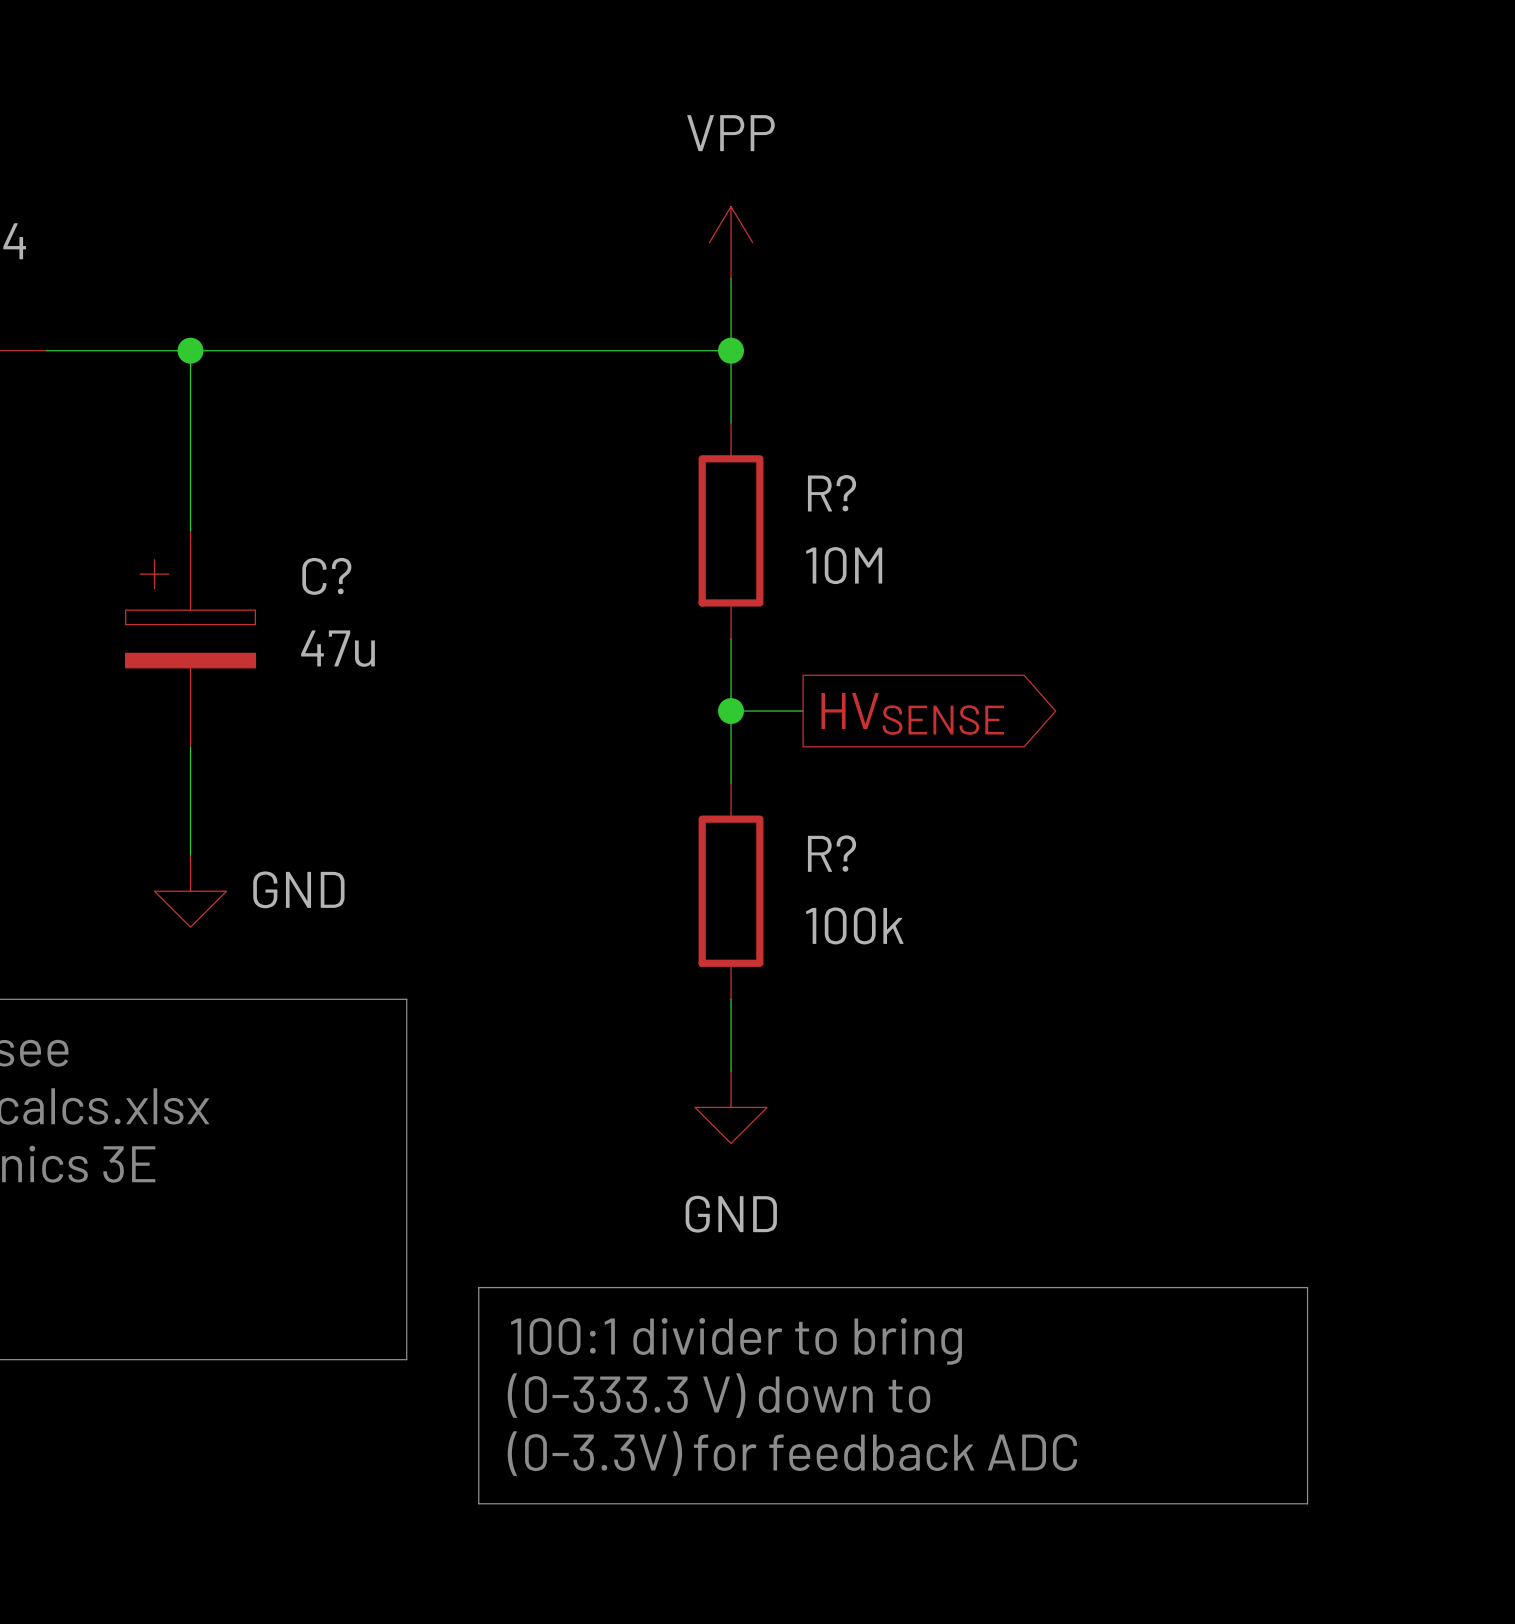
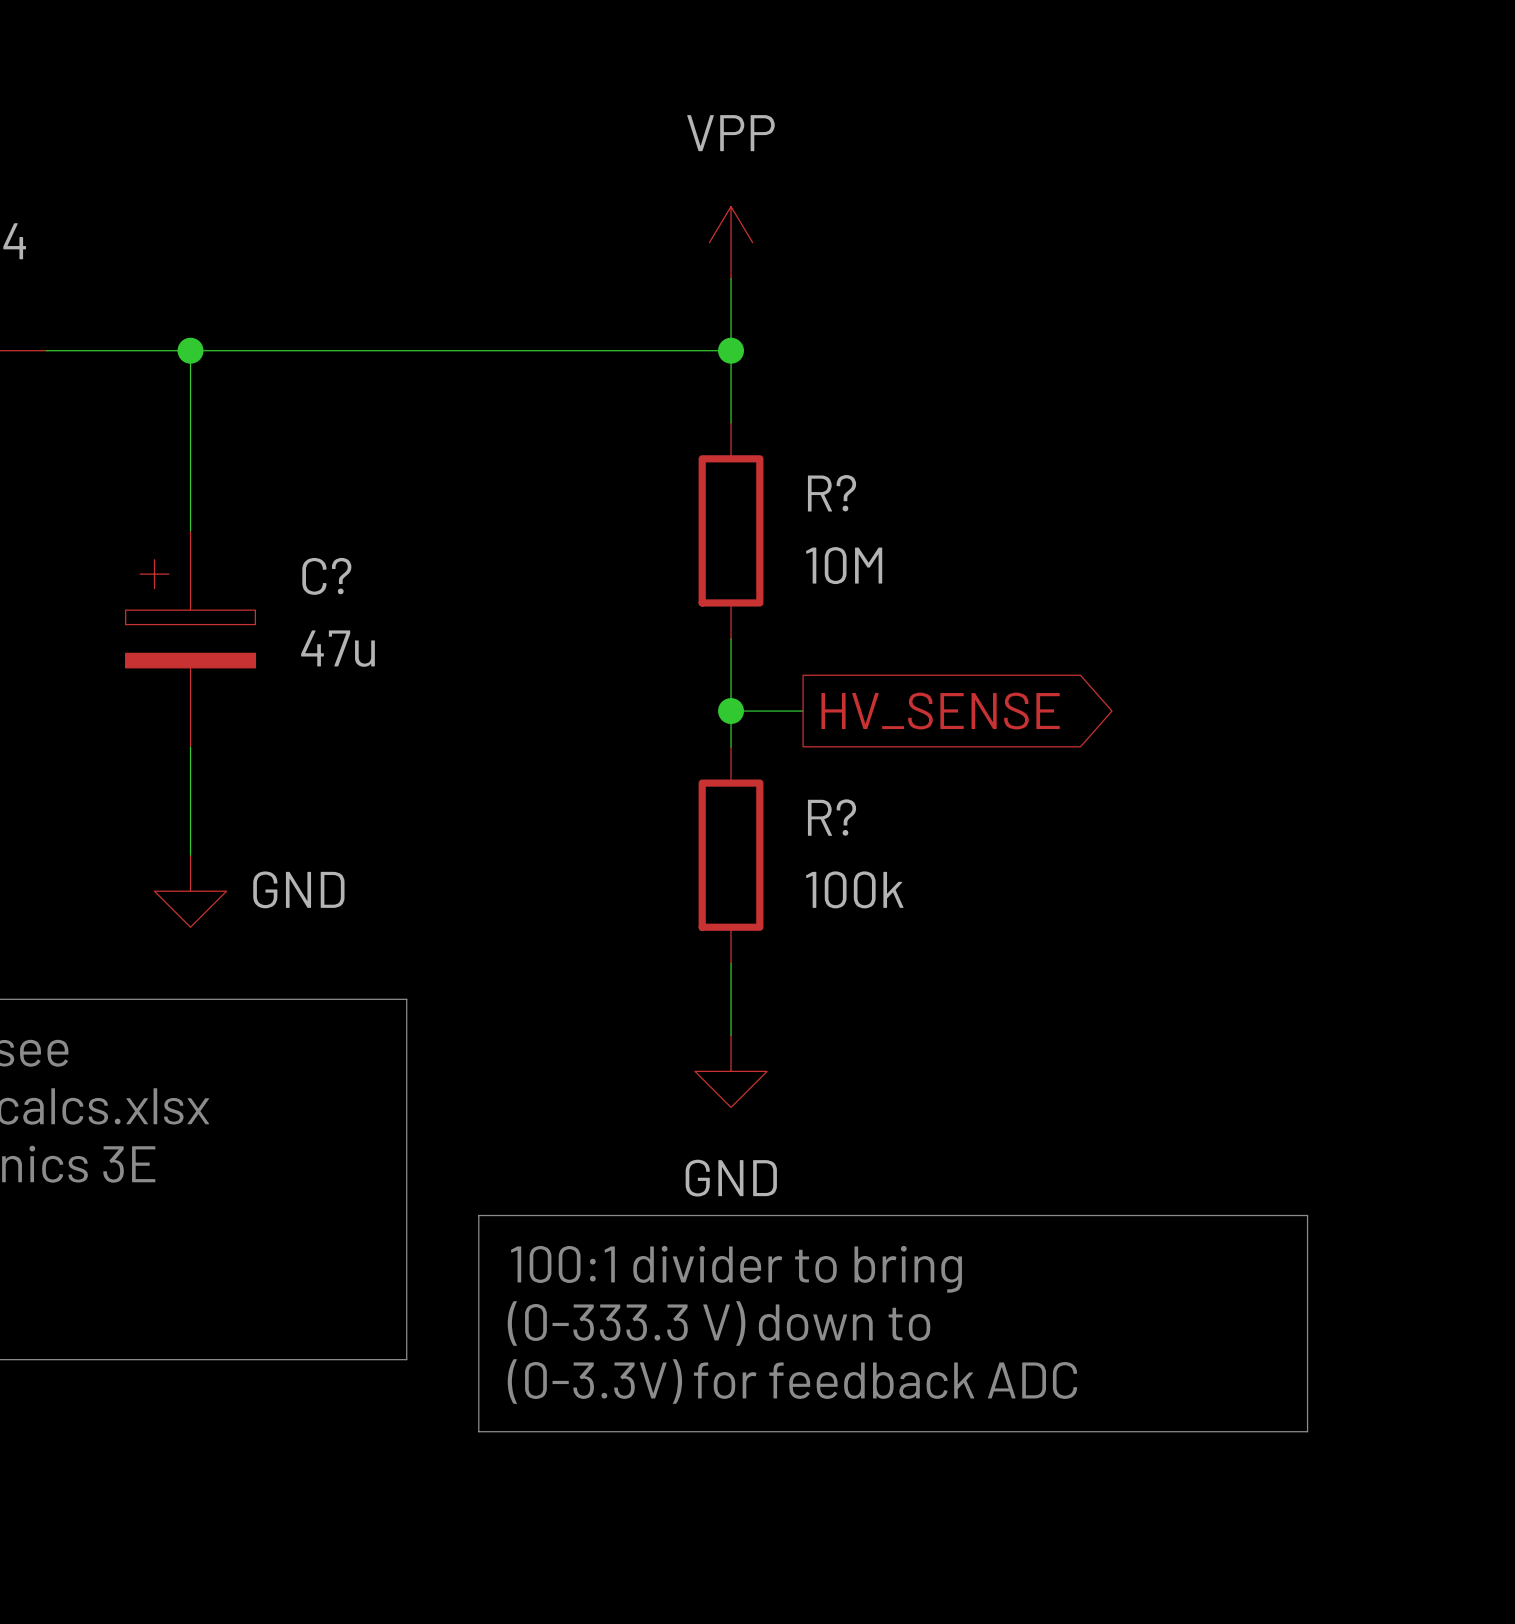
global label: HVSENSE (912, 713) -> HV_SENSE (940, 711)
R? position: (731, 891) -> (731, 855)
power symbol position: GND (731, 1107) -> GND (731, 1071)
line: (478, 1287) (1307, 1287) -> (478, 1287) (478, 1215) (1307, 1215) (1307, 1287)
text position: 100:1 divider to bring (736, 1341) -> 100:1 divider to bring (736, 1269)
text position: (0-333.3 V) down to (719, 1395) -> (0-333.3 V) down to (719, 1323)
line: (478, 1431) (478, 1503) (1307, 1503) (1307, 1431) -> (478, 1431) (1307, 1431)
text position: (0-3.3V) for feedback ADC (792, 1453) -> (0-3.3V) for feedback ADC (792, 1381)

